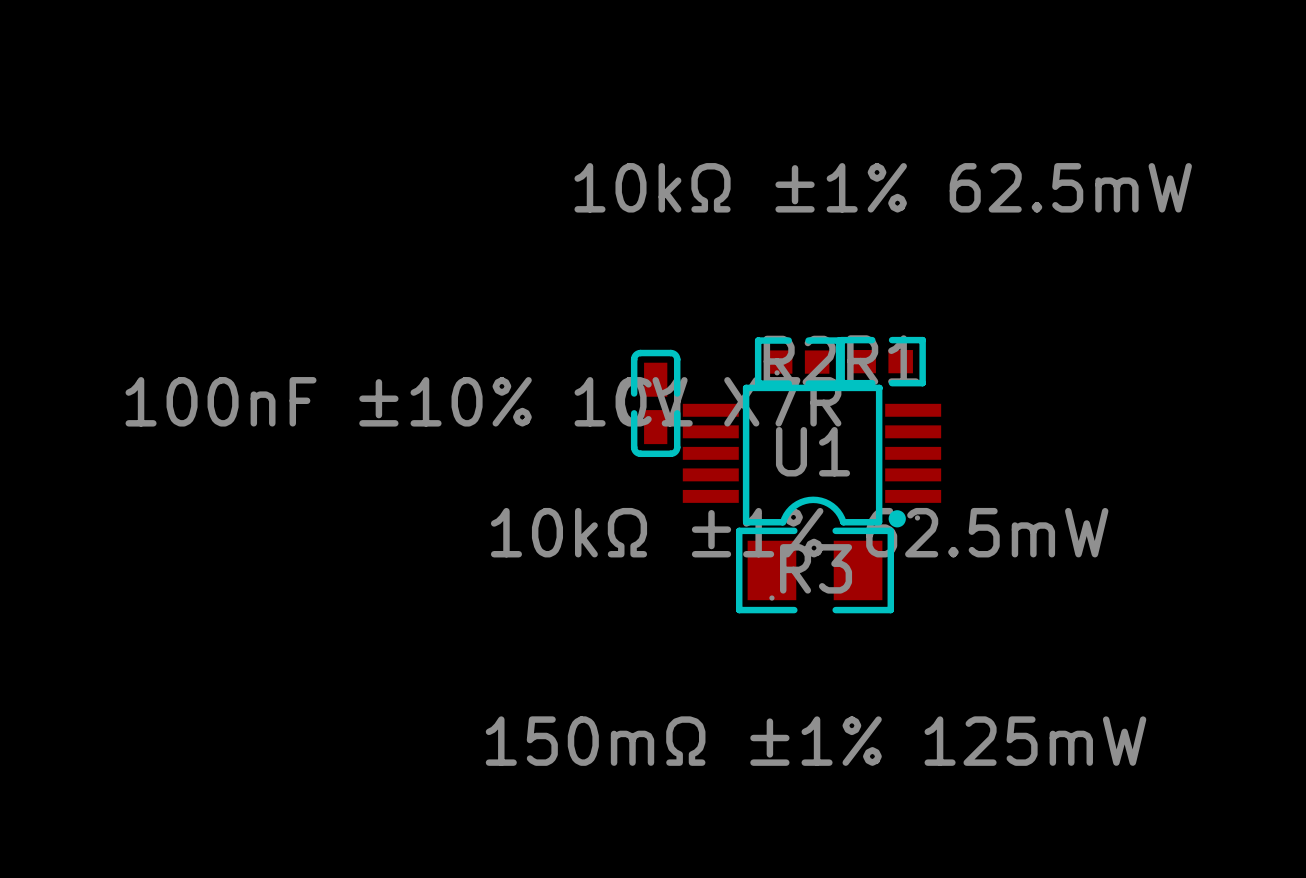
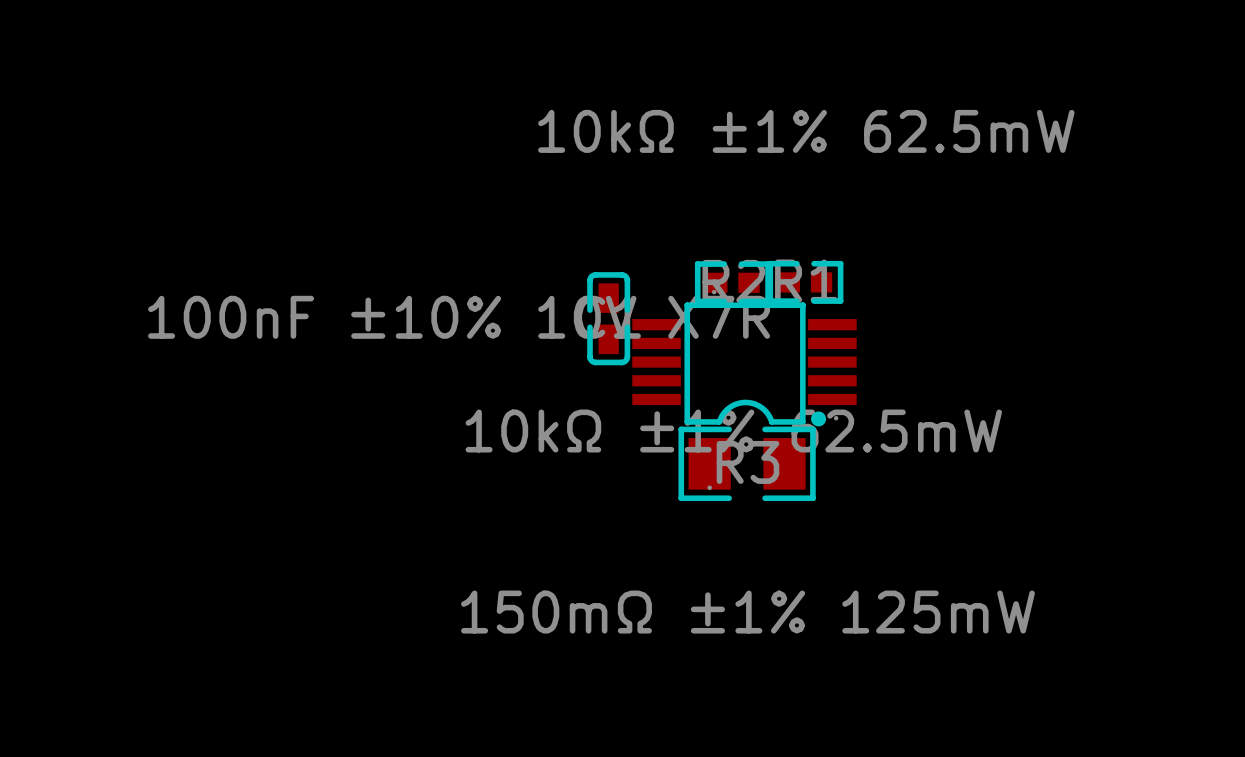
U1 name: U1 (813, 451) -> none

